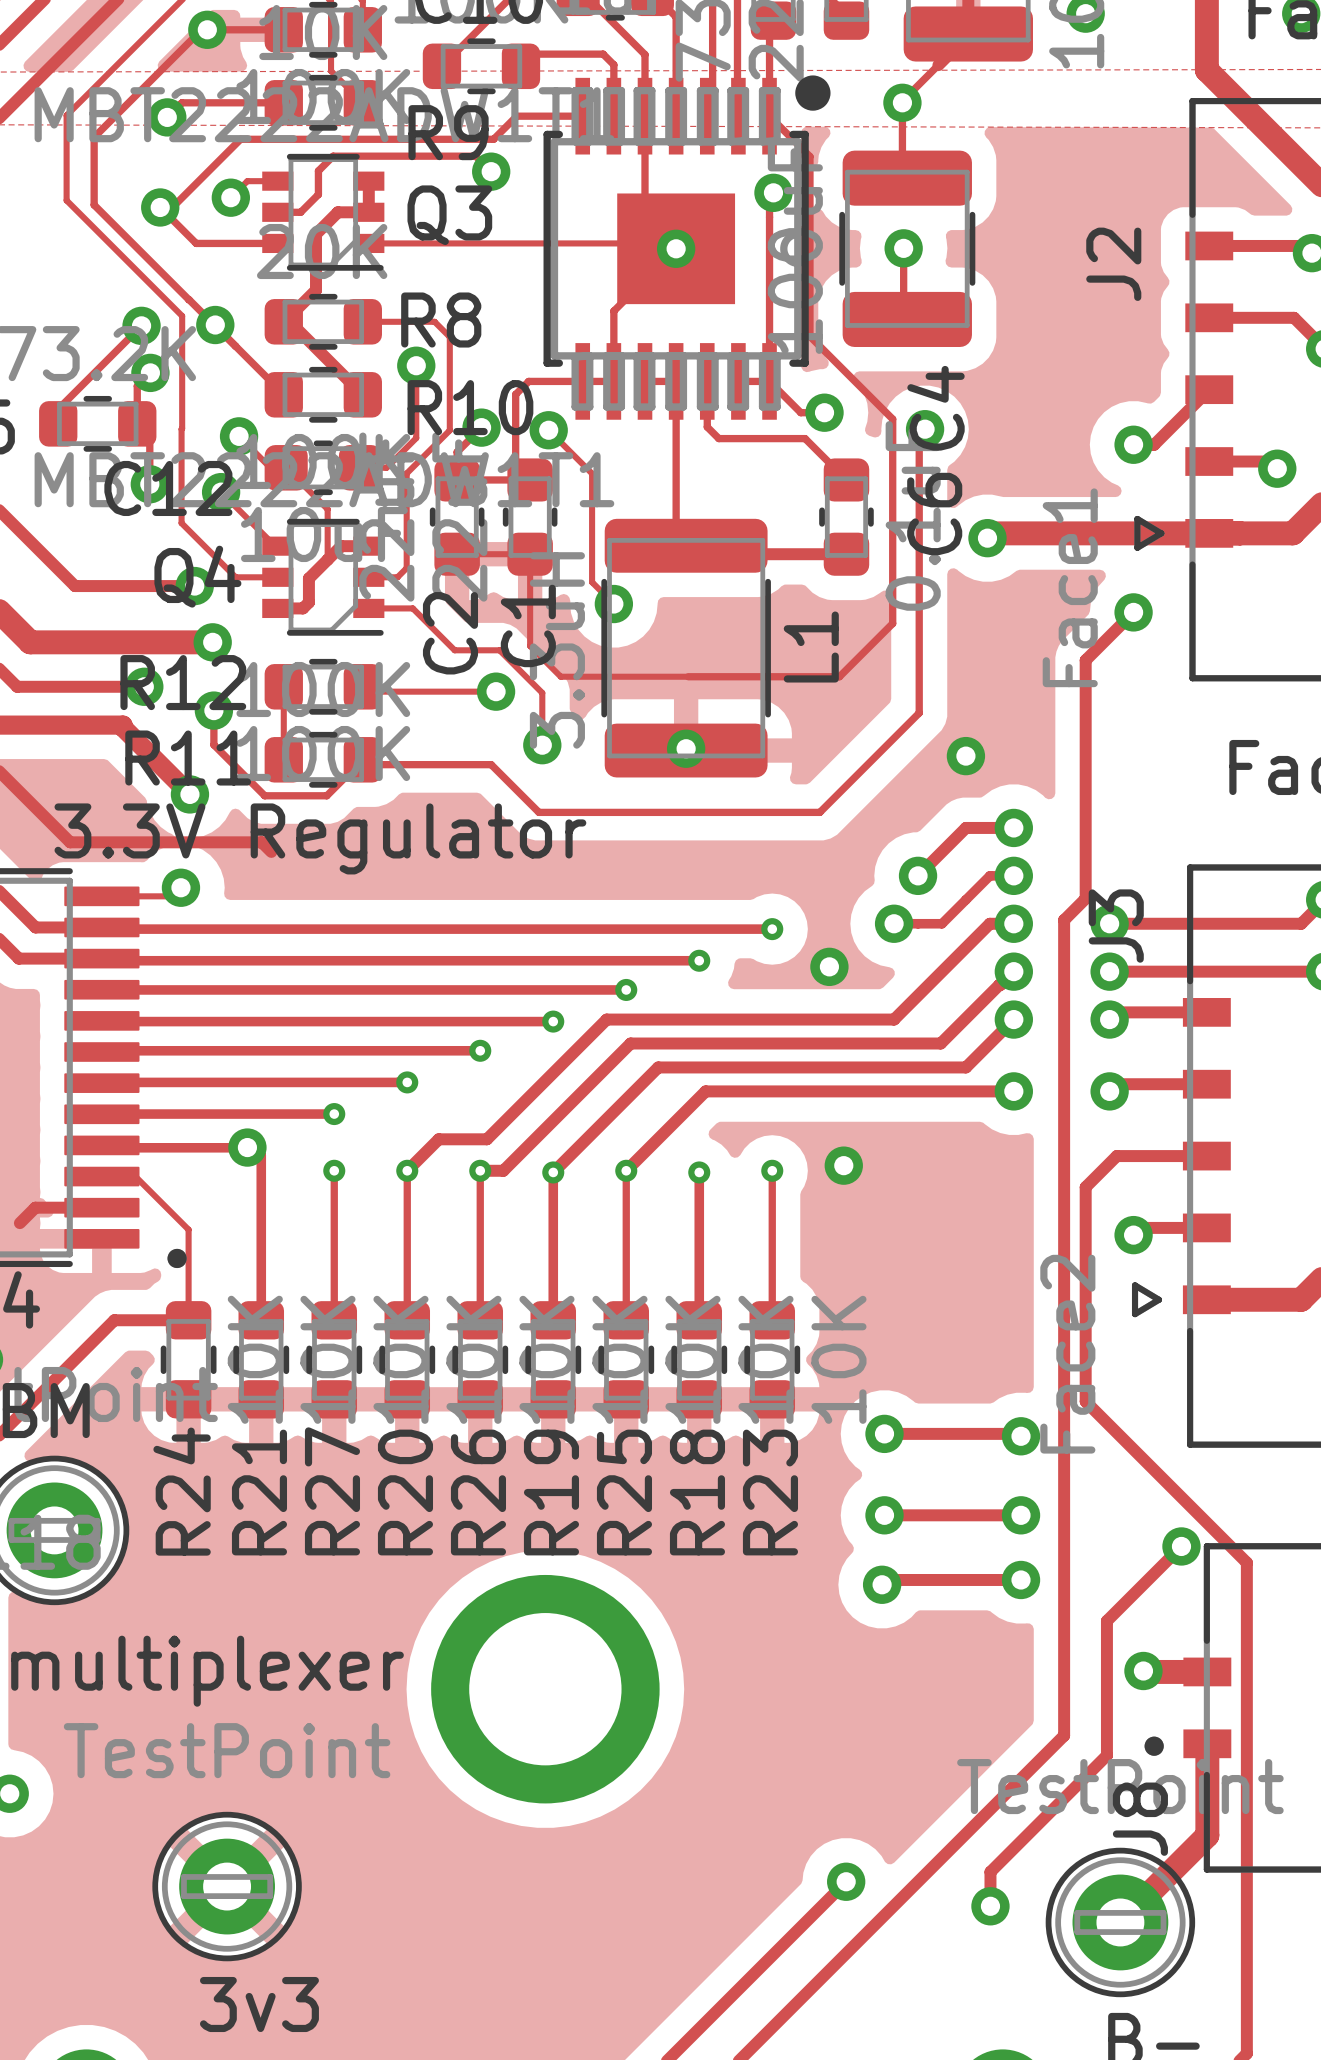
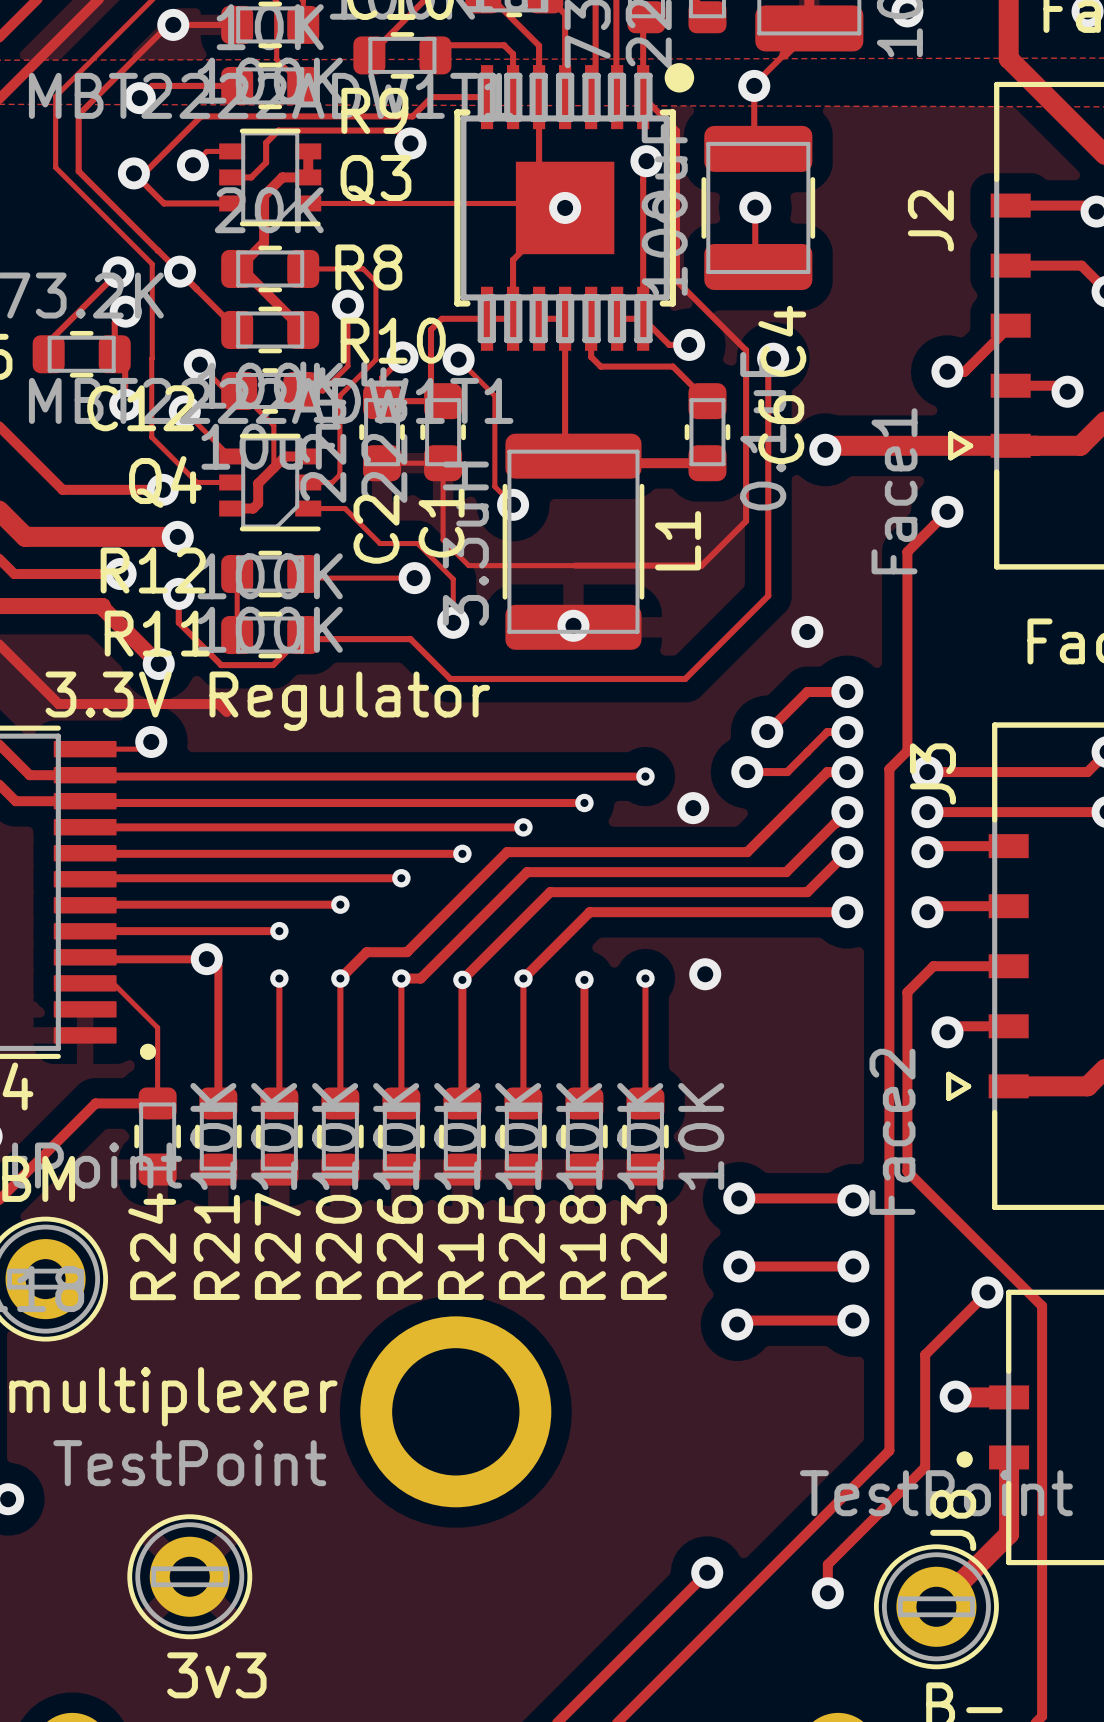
track: (101, 1207) (35, 1207) (19, 1223) -> none

